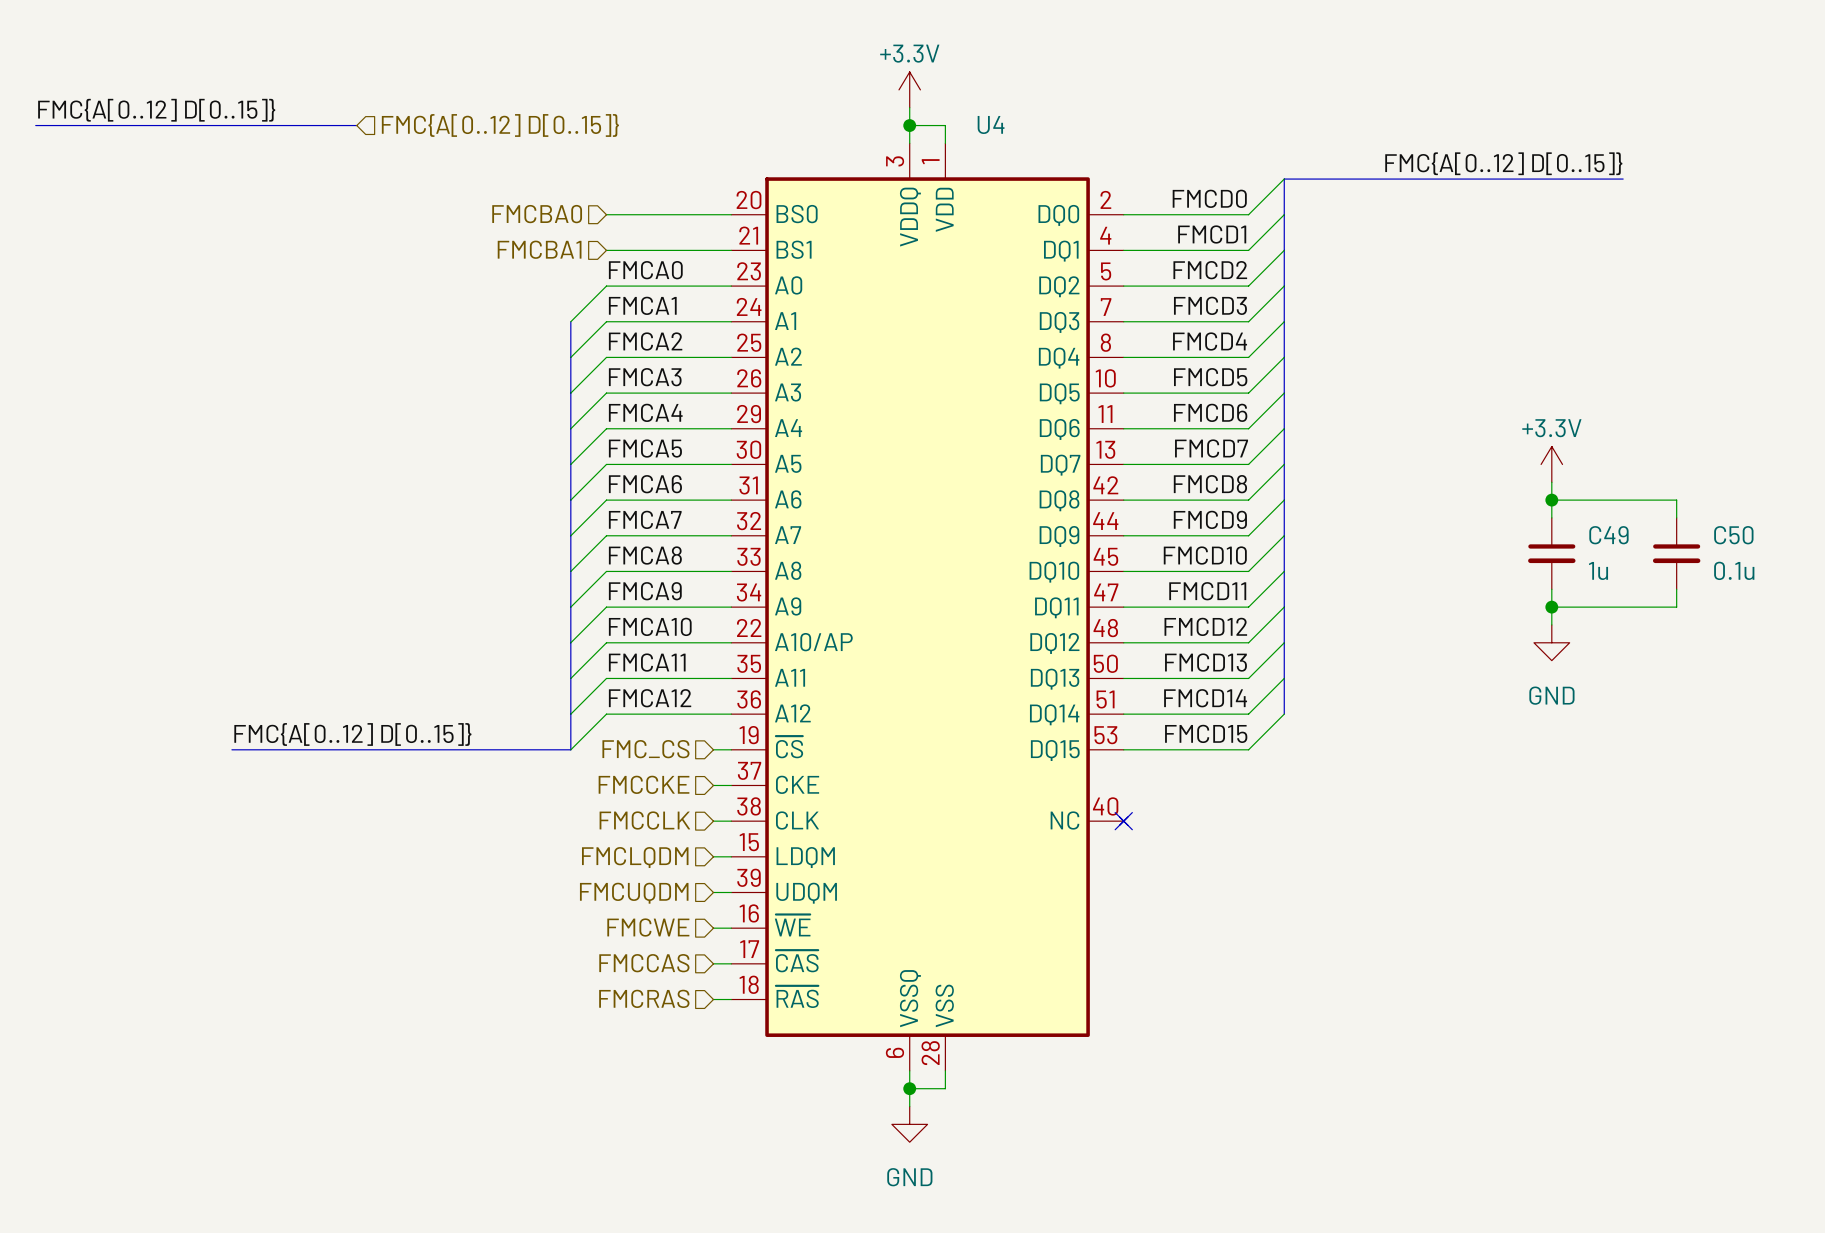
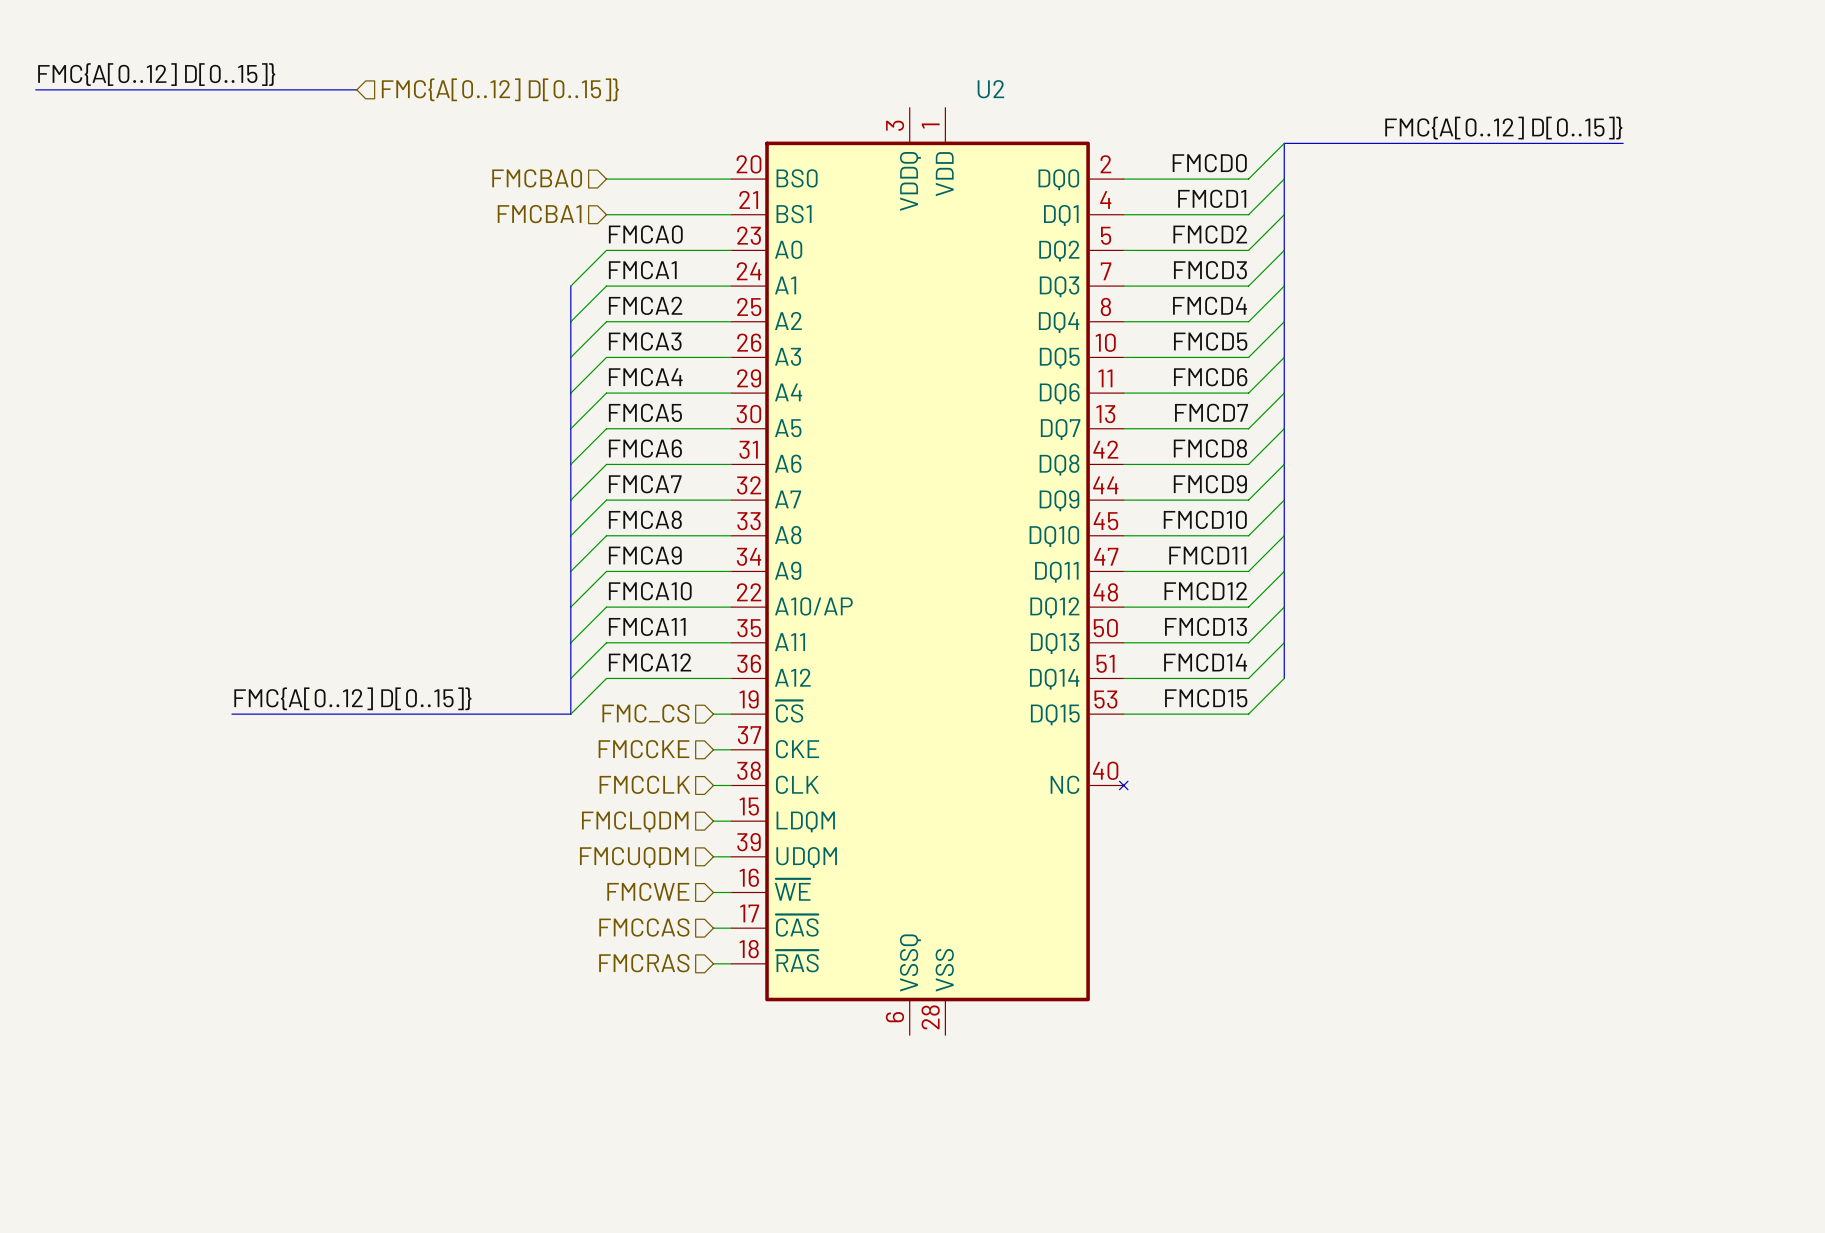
power symbol: +3.3V (909, 89) -> none
label position: FMC{A[0..12] D[0..15]} (156, 110) -> FMC{A[0..12] D[0..15]} (156, 74)
bus: (35, 125) (356, 125) -> (35, 89) (356, 89)
hierarchical label position: FMC{A[0..12] D[0..15]} (500, 125) -> FMC{A[0..12] D[0..15]} (500, 89)
wire: (909, 125) (945, 125) (945, 143) -> none
junction: (909, 125) -> none
wire: none -> (1284, 143) (1248, 179) (1123, 179)
label: none -> FMCD0 (1209, 163)
label position: FMC{A[0..12] D[0..15]} (1503, 163) -> FMC{A[0..12] D[0..15]} (1503, 128)
hierarchical label: none -> FMCBA0 (537, 178)
wire: none -> (606, 179) (731, 179)
bus: (1284, 179) (1623, 179) -> (1284, 179) (1284, 143) (1623, 143)
label: FMCD0 (1209, 198) -> FMCD1 (1212, 198)
hierarchical label: FMCBA0 (537, 214) -> FMCBA1 (539, 214)
label: none -> FMCA0 (645, 234)
label: FMCD1 (1212, 234) -> FMCD2 (1210, 234)
hierarchical label: FMCBA1 (539, 249) -> none
wire: none -> (606, 250) (570, 286)
label: FMCA0 (645, 270) -> FMCA1 (642, 270)
label: FMCD2 (1210, 270) -> FMCD3 (1210, 270)
bus: none -> (570, 286) (570, 321)
label: FMCA1 (642, 305) -> FMCA2 (645, 305)
label: FMCD3 (1210, 305) -> FMCD4 (1210, 305)
label: FMCA2 (645, 341) -> FMCA3 (645, 341)
label: FMCD4 (1210, 341) -> FMCD5 (1210, 341)
label: FMCA3 (645, 377) -> FMCA4 (645, 377)
label: FMCD5 (1210, 377) -> FMCD6 (1210, 377)
label: FMCA4 (645, 412) -> FMCA5 (645, 412)
label: FMCD6 (1210, 412) -> FMCD7 (1211, 412)
label: FMCA5 (645, 448) -> FMCA6 (645, 448)
label: FMCD7 (1211, 448) -> FMCD8 (1210, 448)
power symbol: +3.3V (1551, 464) -> none
wire: (1551, 482) (1551, 517) -> none
label: FMCA6 (645, 484) -> FMCA7 (645, 484)
label: FMCD8 (1210, 484) -> FMCD9 (1210, 484)
wire: (1551, 500) (1676, 500) (1676, 517) -> none
junction: (1551, 500) -> none
label: FMCA7 (645, 519) -> FMCA8 (645, 519)
label: FMCD9 (1210, 519) -> FMCD10 (1205, 519)
C49: 1u (1551, 553) -> none
C50: 0.1u (1676, 553) -> none
label: FMCA8 (645, 555) -> FMCA9 (645, 555)
label: FMCD10 (1205, 555) -> FMCD11 (1207, 555)
U2: none -> (929, 571)
wire: (1551, 589) (1551, 624) -> none
wire: (1676, 589) (1676, 607) (1551, 607) -> none
label: FMCA9 (645, 591) -> FMCA10 (650, 591)
label: FMCD11 (1207, 591) -> FMCD12 (1205, 591)
U4: (929, 607) -> none
junction: (1551, 607) -> none
label: FMCA10 (650, 626) -> FMCA11 (647, 626)
label: FMCD12 (1205, 626) -> FMCD13 (1205, 626)
power symbol: GND (1551, 642) -> none
label: FMCA11 (647, 662) -> FMCA12 (650, 662)
label: FMCD13 (1205, 662) -> FMCD14 (1205, 662)
bus: (1284, 678) (1284, 714) -> none
label: FMCA12 (650, 698) -> none
label: FMCD14 (1205, 698) -> FMCD15 (1206, 698)
hierarchical label: none -> FMC_CS (645, 713)
bus: (570, 714) (570, 749) (231, 749) -> (570, 714) (231, 714)
wire: (713, 714) (606, 714) (570, 749) -> none
wire: (1284, 714) (1248, 749) (1123, 749) -> none
label: FMCD15 (1206, 733) -> none
label position: FMC{A[0..12] D[0..15]} (352, 734) -> FMC{A[0..12] D[0..15]} (352, 698)
hierarchical label: FMC_CS (645, 749) -> FMCCKE (644, 749)
hierarchical label: FMCCKE (644, 784) -> FMCCLK (644, 784)
hierarchical label: FMCCLK (644, 820) -> FMCLQDM (635, 821)
no-connect mark: (1123, 821) -> none
hierarchical label: FMCLQDM (635, 857) -> FMCUQDM (634, 857)
hierarchical label: FMCUQDM (634, 893) -> FMCWE (648, 891)
hierarchical label: FMCWE (648, 927) -> FMCCAS (644, 927)
hierarchical label: FMCCAS (644, 963) -> FMCRAS (644, 963)
hierarchical label: FMCRAS (644, 998) -> none
wire: (713, 999) (731, 999) -> none
wire: (909, 1070) (909, 1106) -> none
wire: (945, 1070) (945, 1088) (909, 1088) -> none
junction: (909, 1088) -> none
power symbol: GND (909, 1124) -> none

